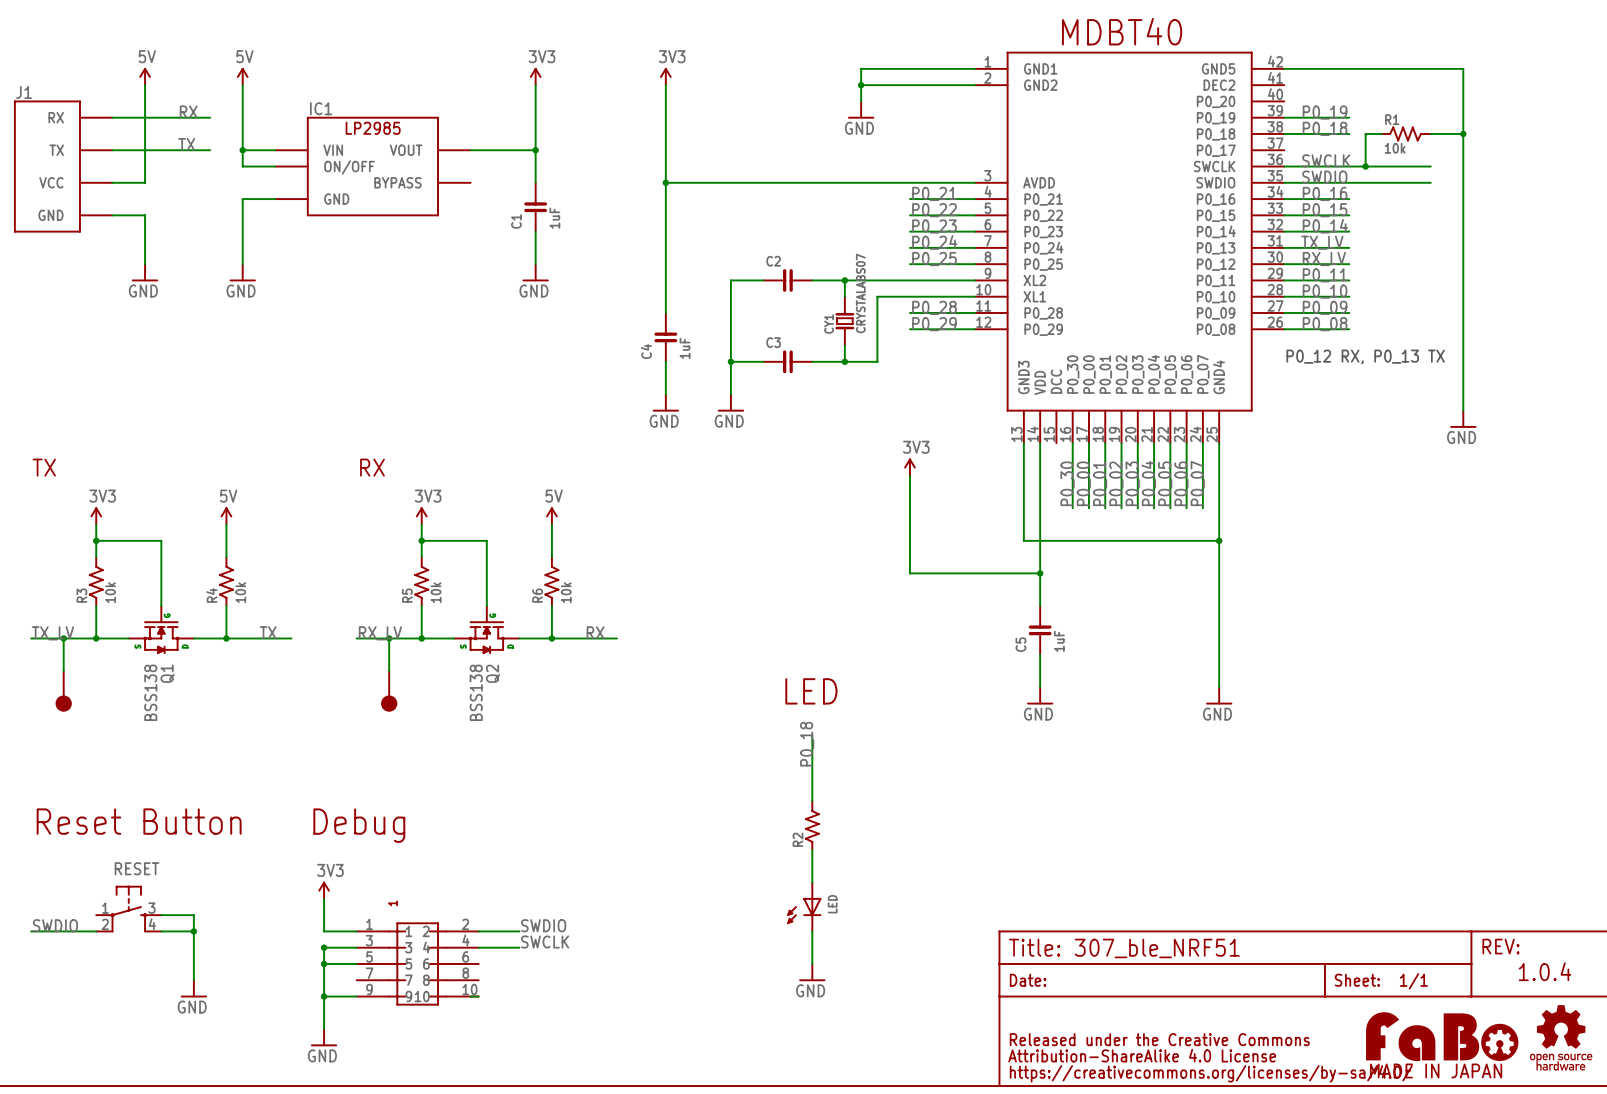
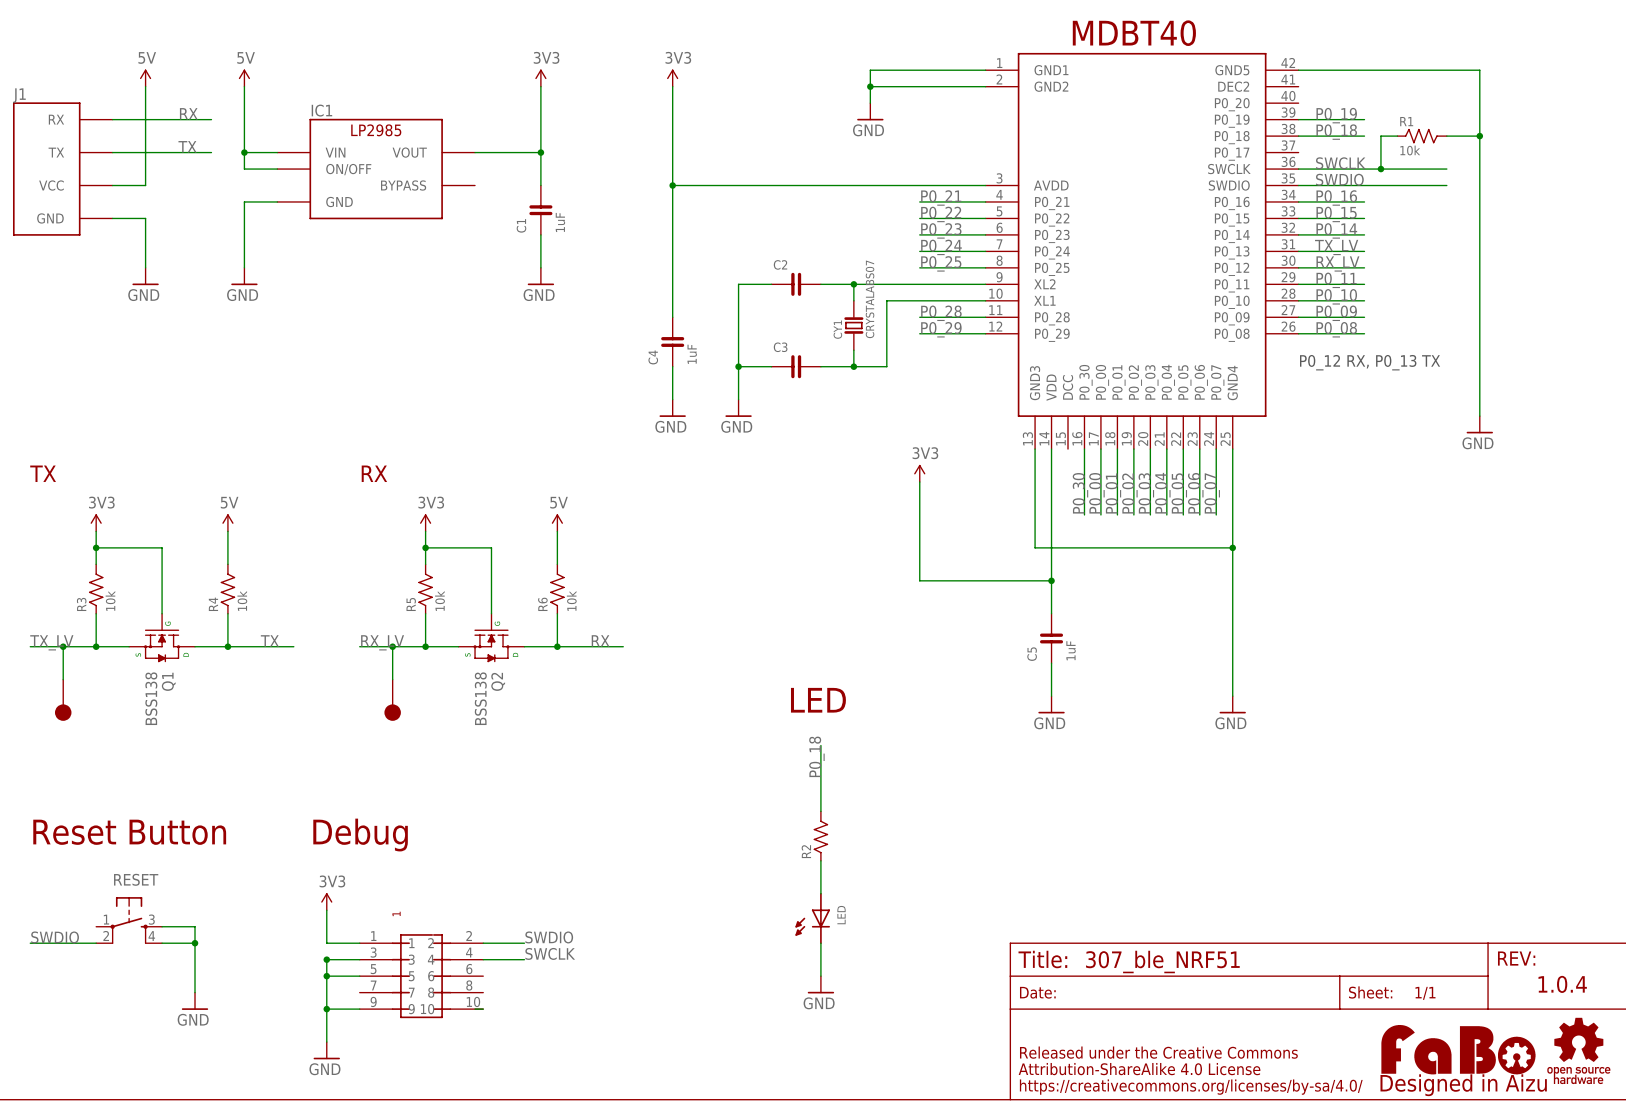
part text: MADE IN JAPAN (1436, 1070) -> none
part text: none -> Designed in Aizu (1463, 1085)

